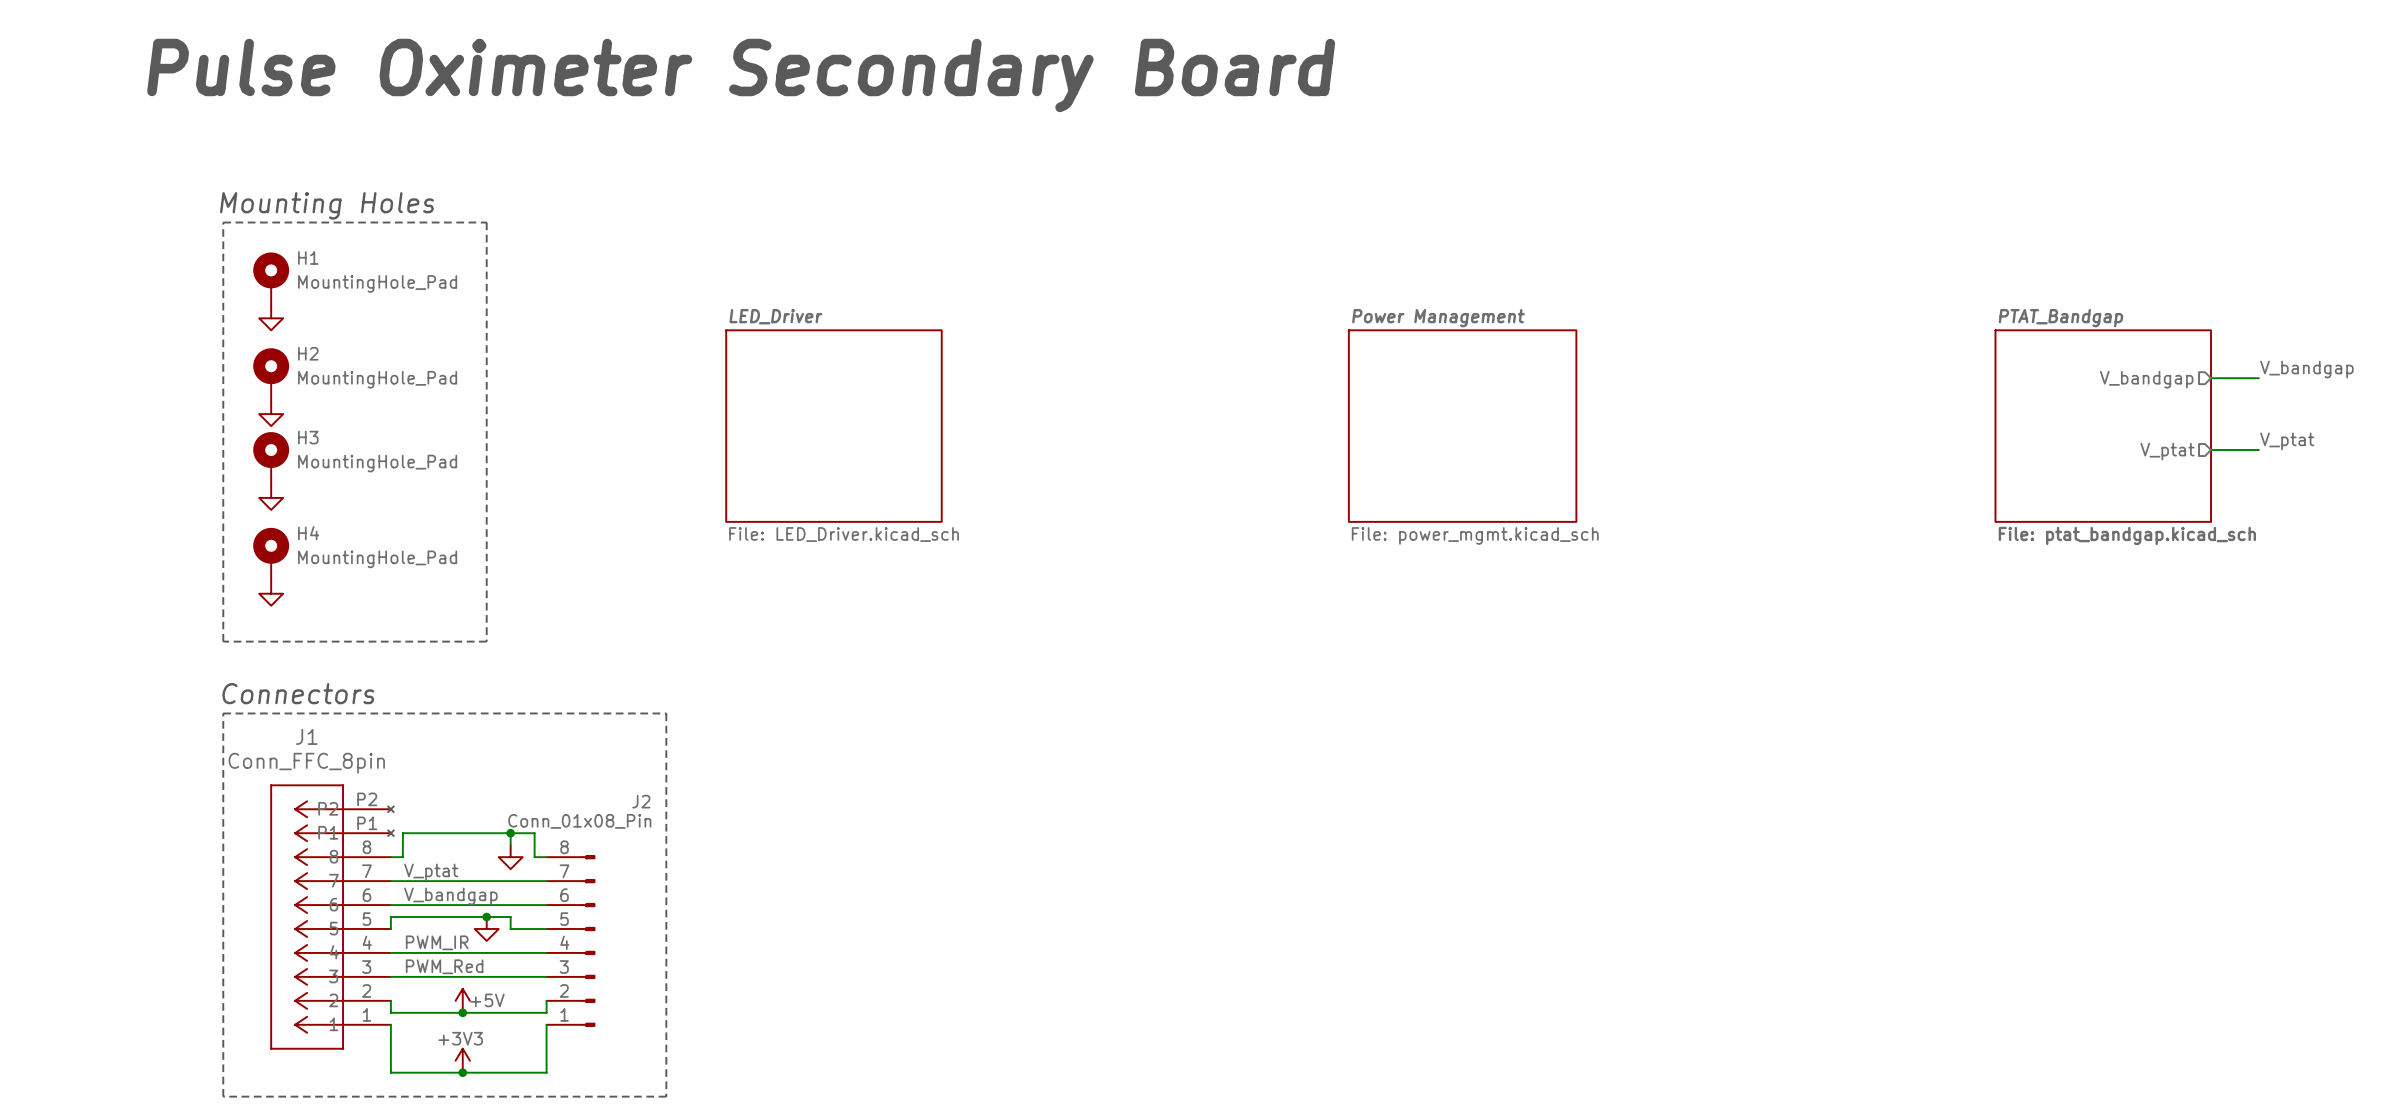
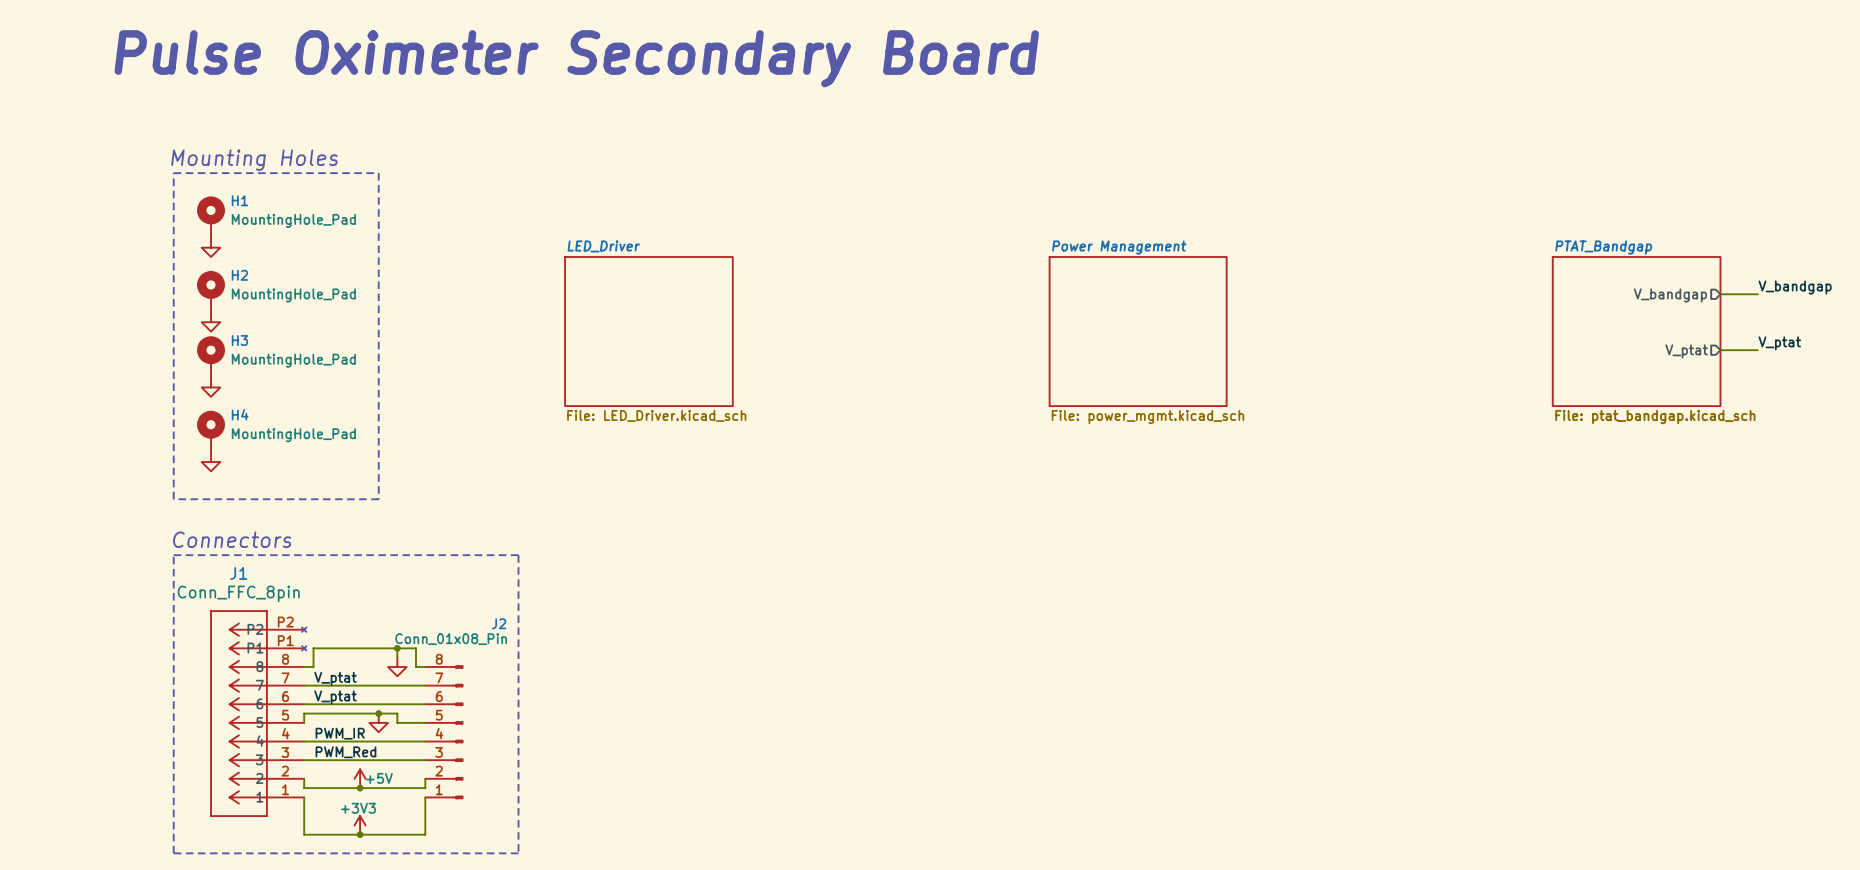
label: V_bandgap (450, 896) -> V_ptat (335, 697)

